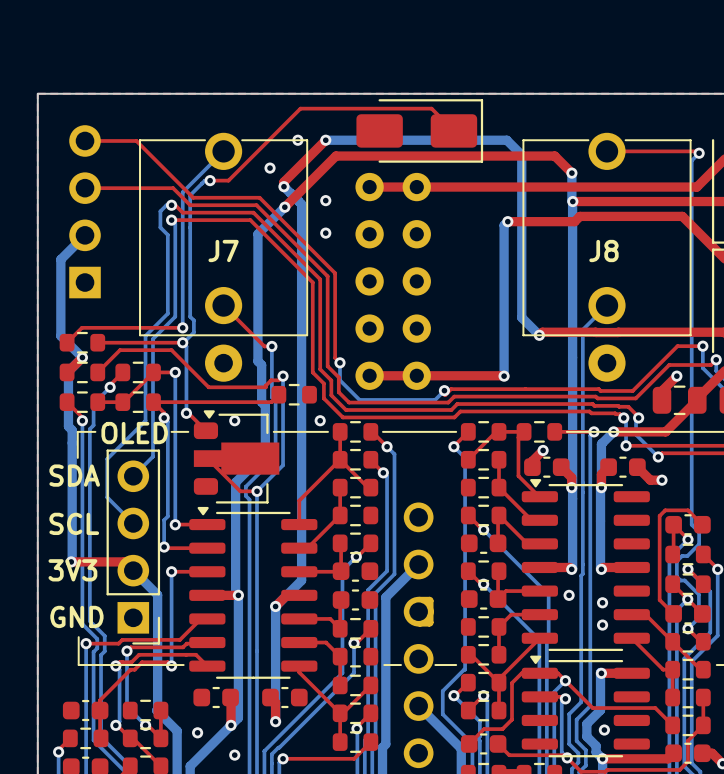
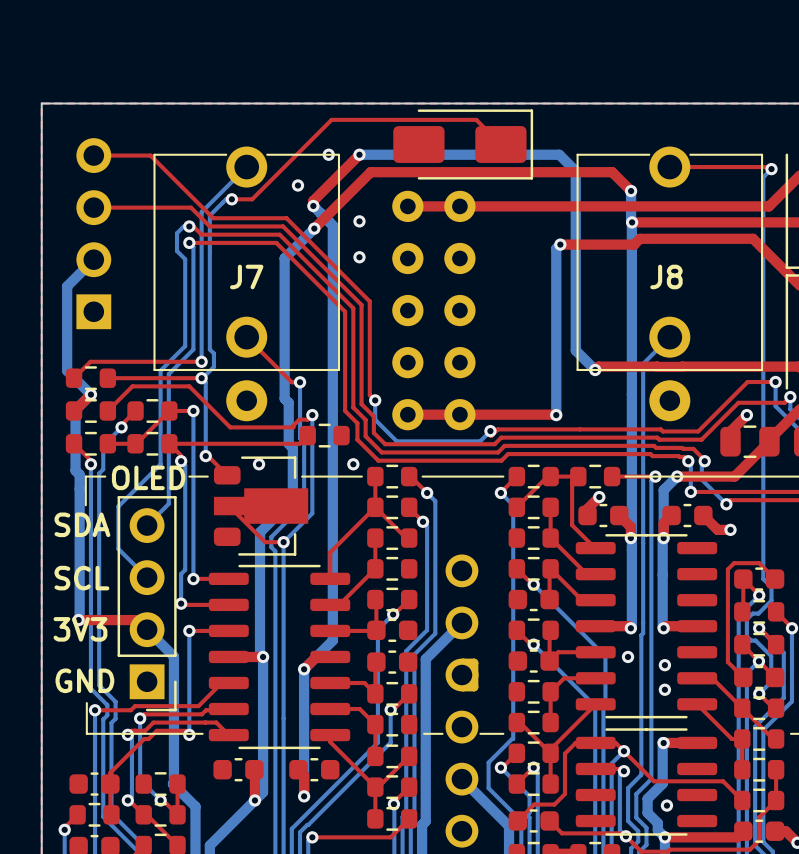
part footprint: [193, 410, 280, 504] -> [213, 456, 309, 556]
part footprint: [521, 479, 650, 651] -> [575, 534, 718, 719]
part footprint: [189, 506, 318, 679] -> [208, 564, 351, 750]
part footprint: [521, 655, 650, 758] -> [575, 728, 718, 836]
via: (197, 732) -> none
via: (234, 755) -> none

